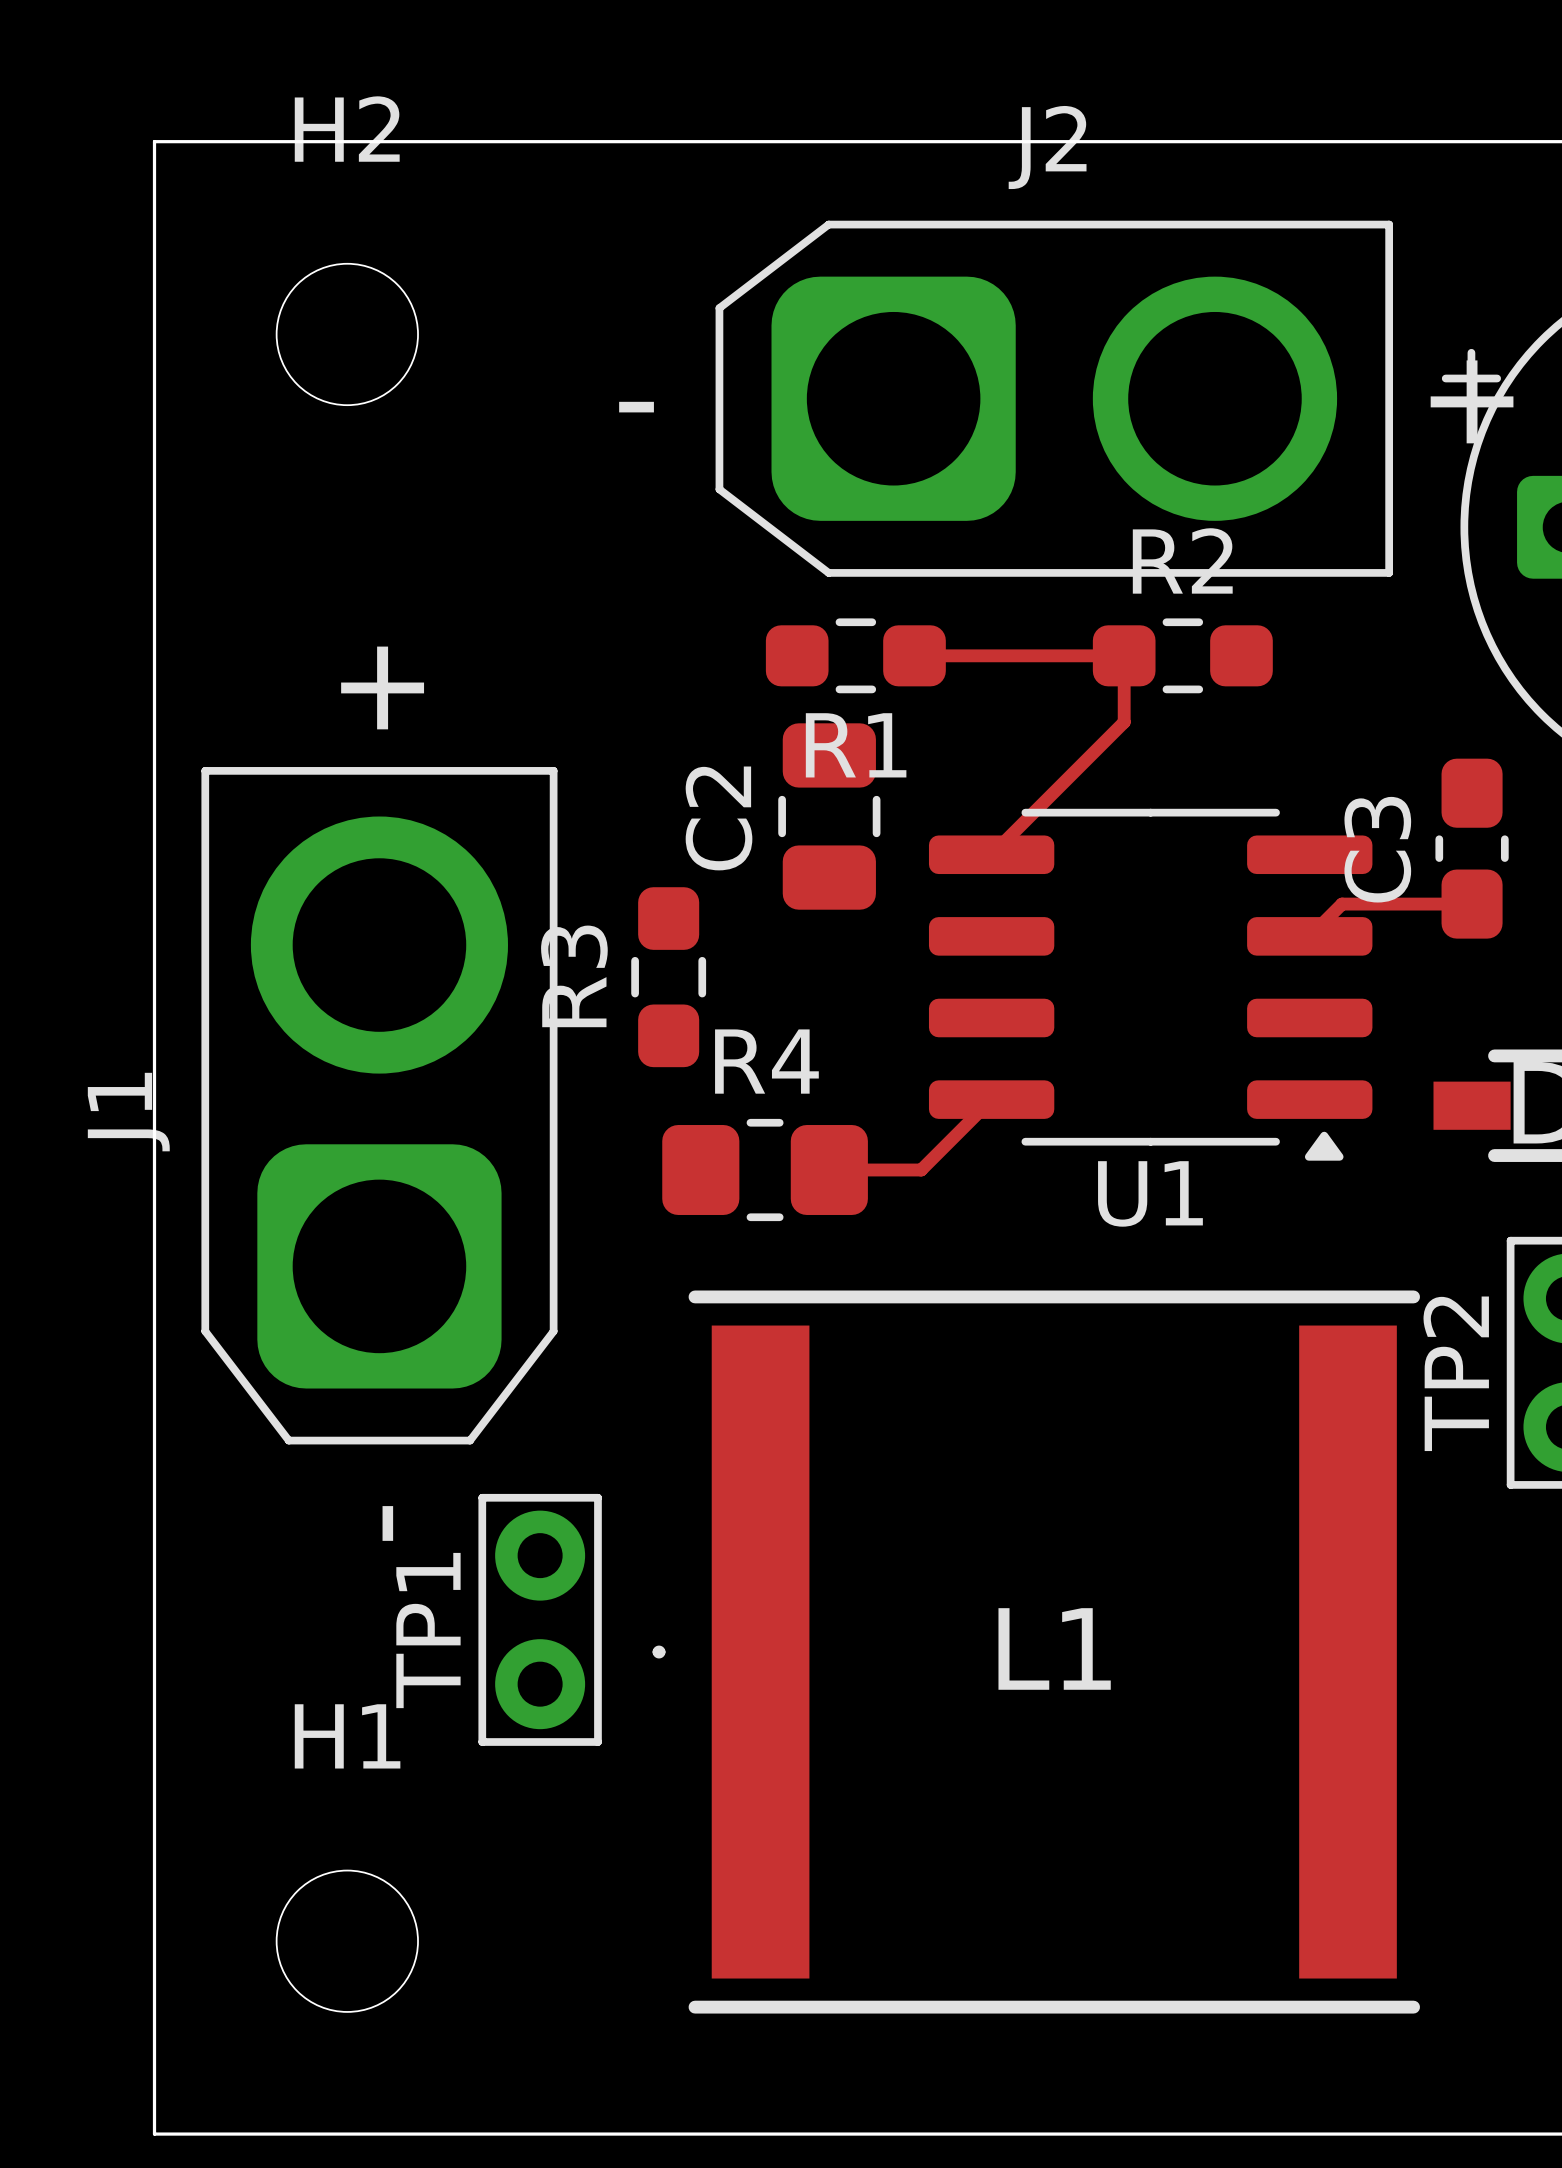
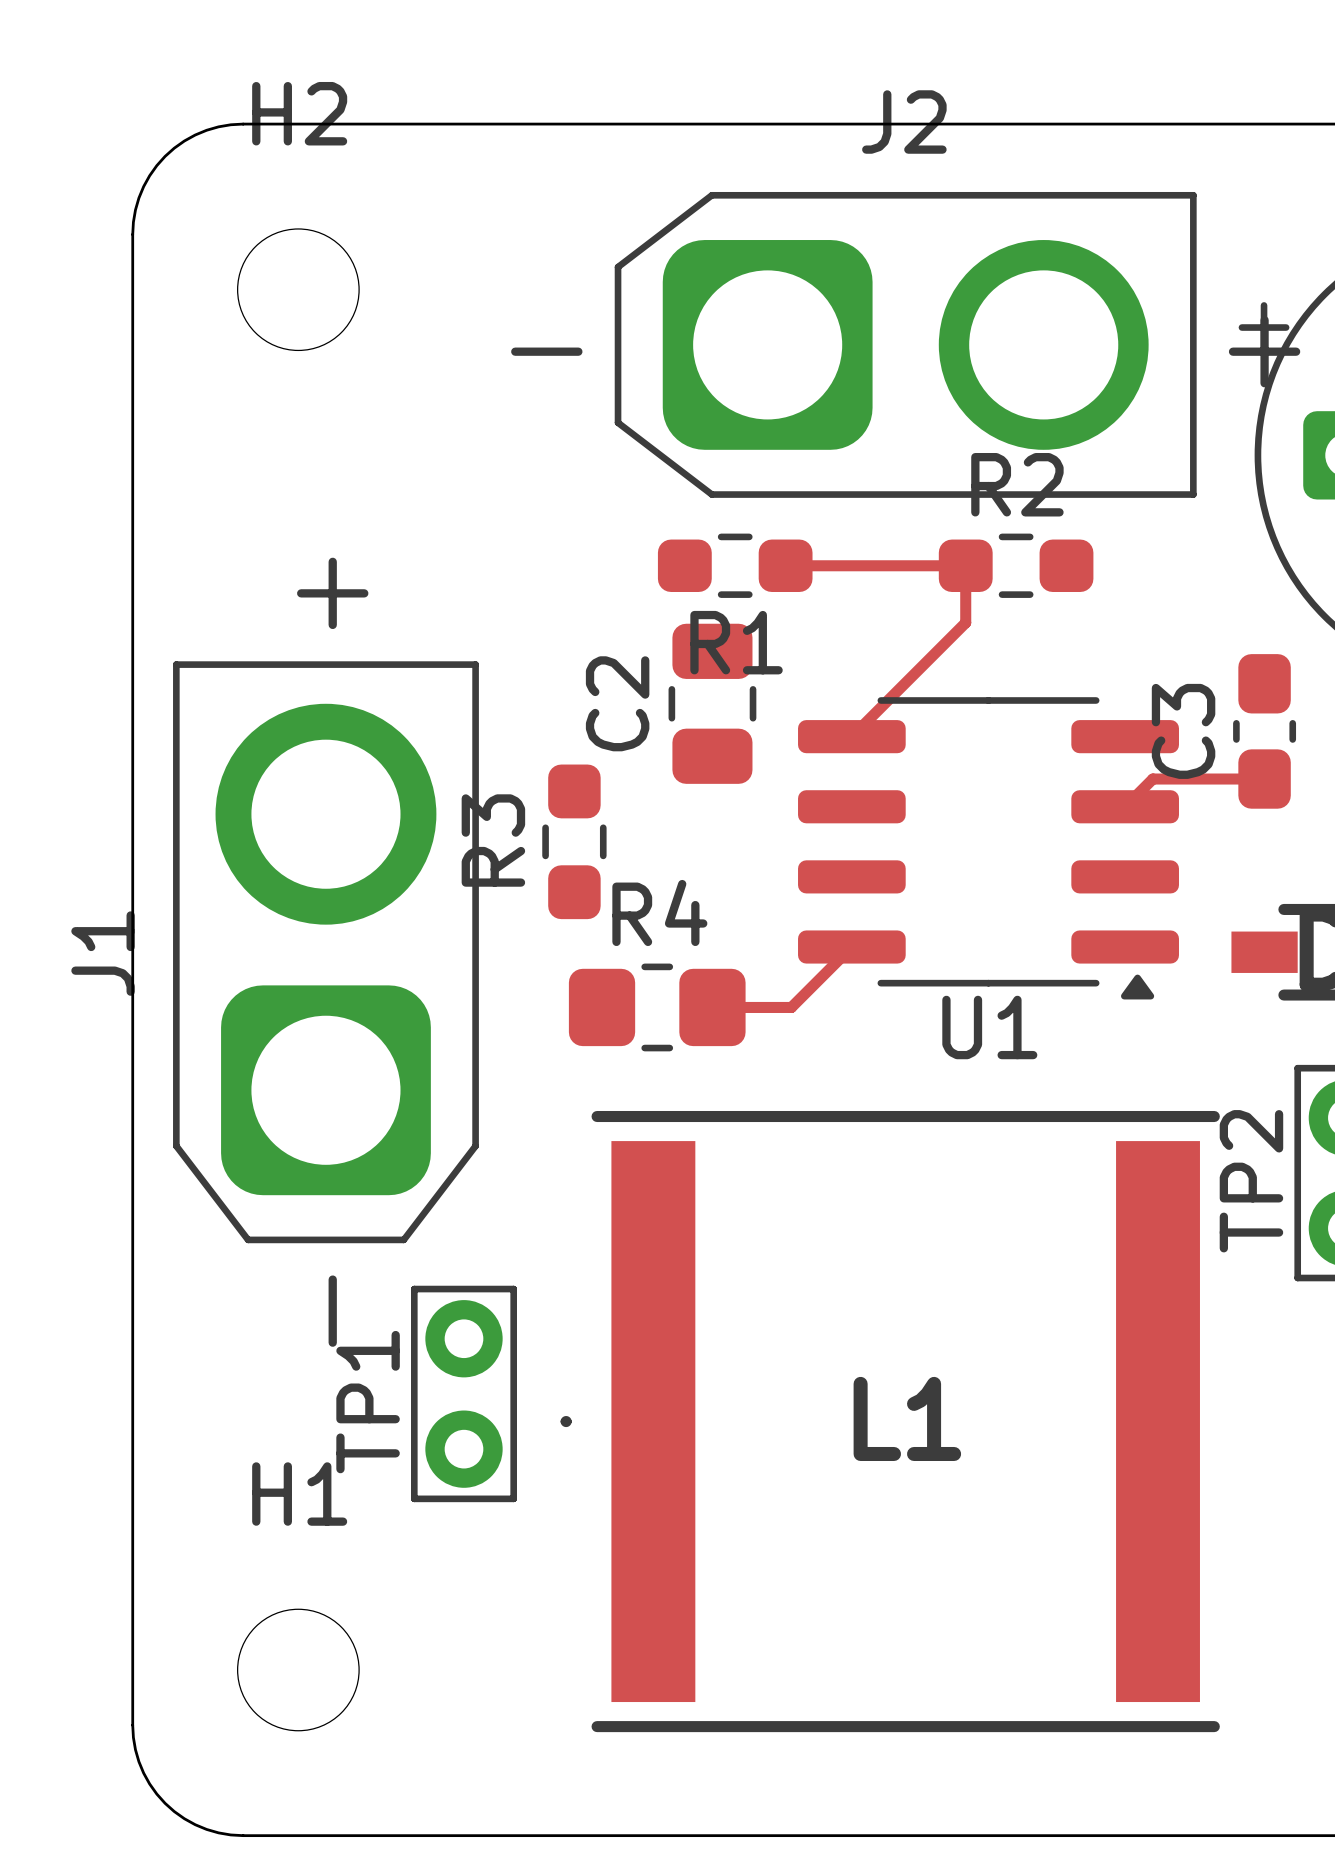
board edge: (283, 141) (154, 141) (154, 270) -> (243, 124) (206, 130) (184, 141) (165, 156) (143, 186) (135, 209) (132, 234)
board edge: (154, 2005) (154, 2134) (283, 2134) -> (132, 1725) (138, 1761) (149, 1783) (165, 1803) (184, 1818) (206, 1829) (243, 1835)

